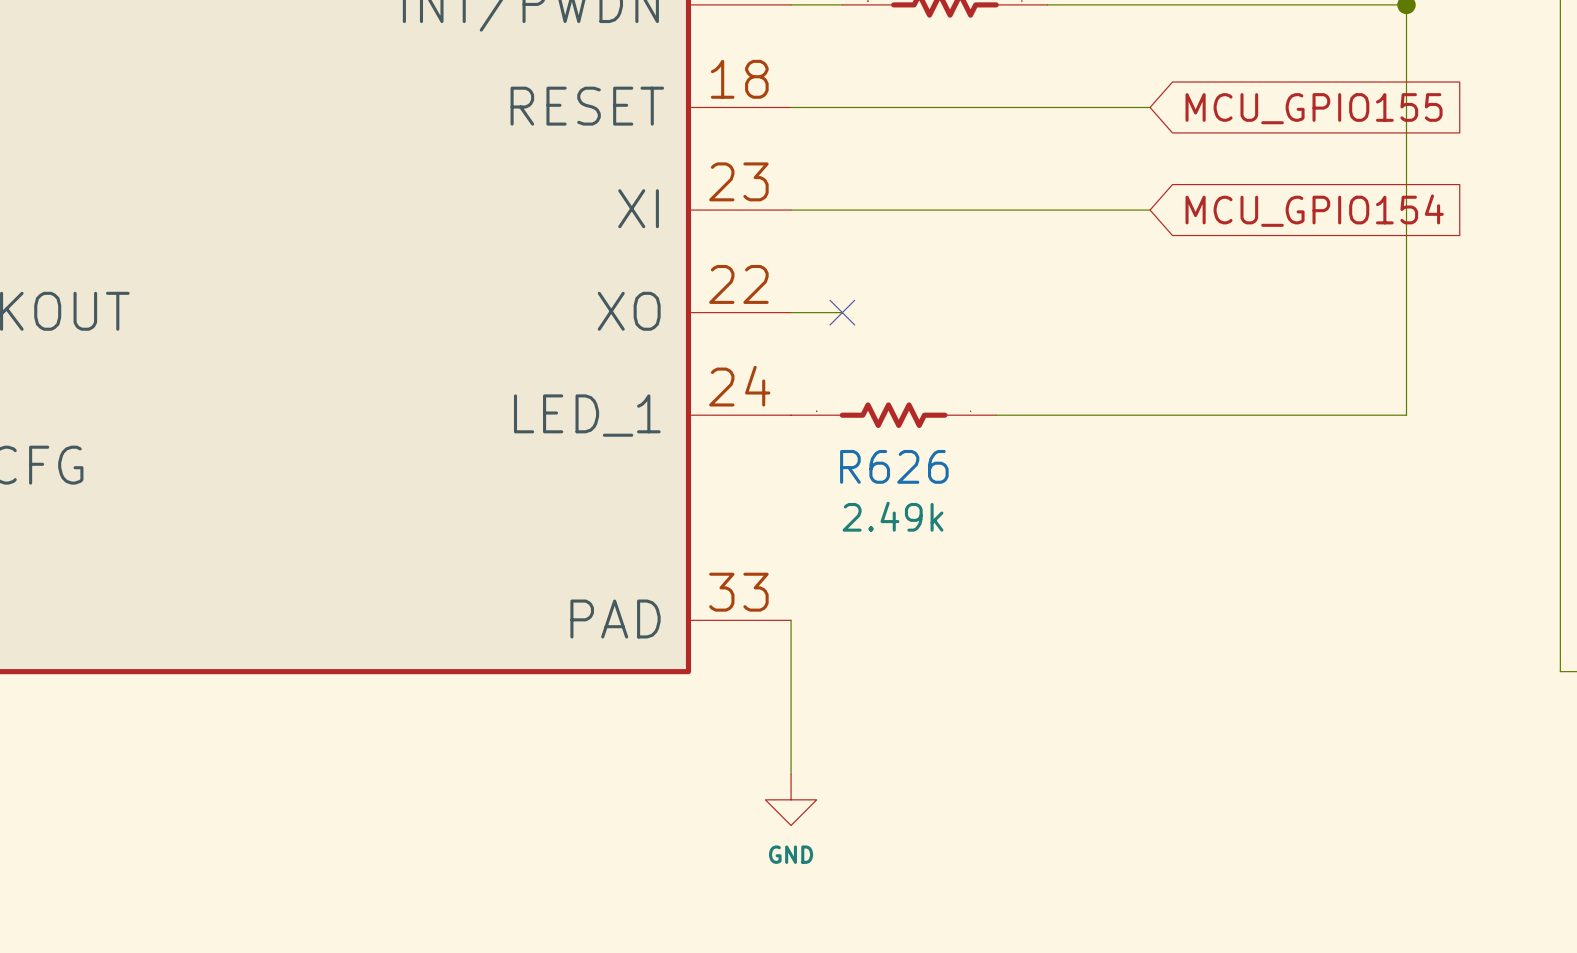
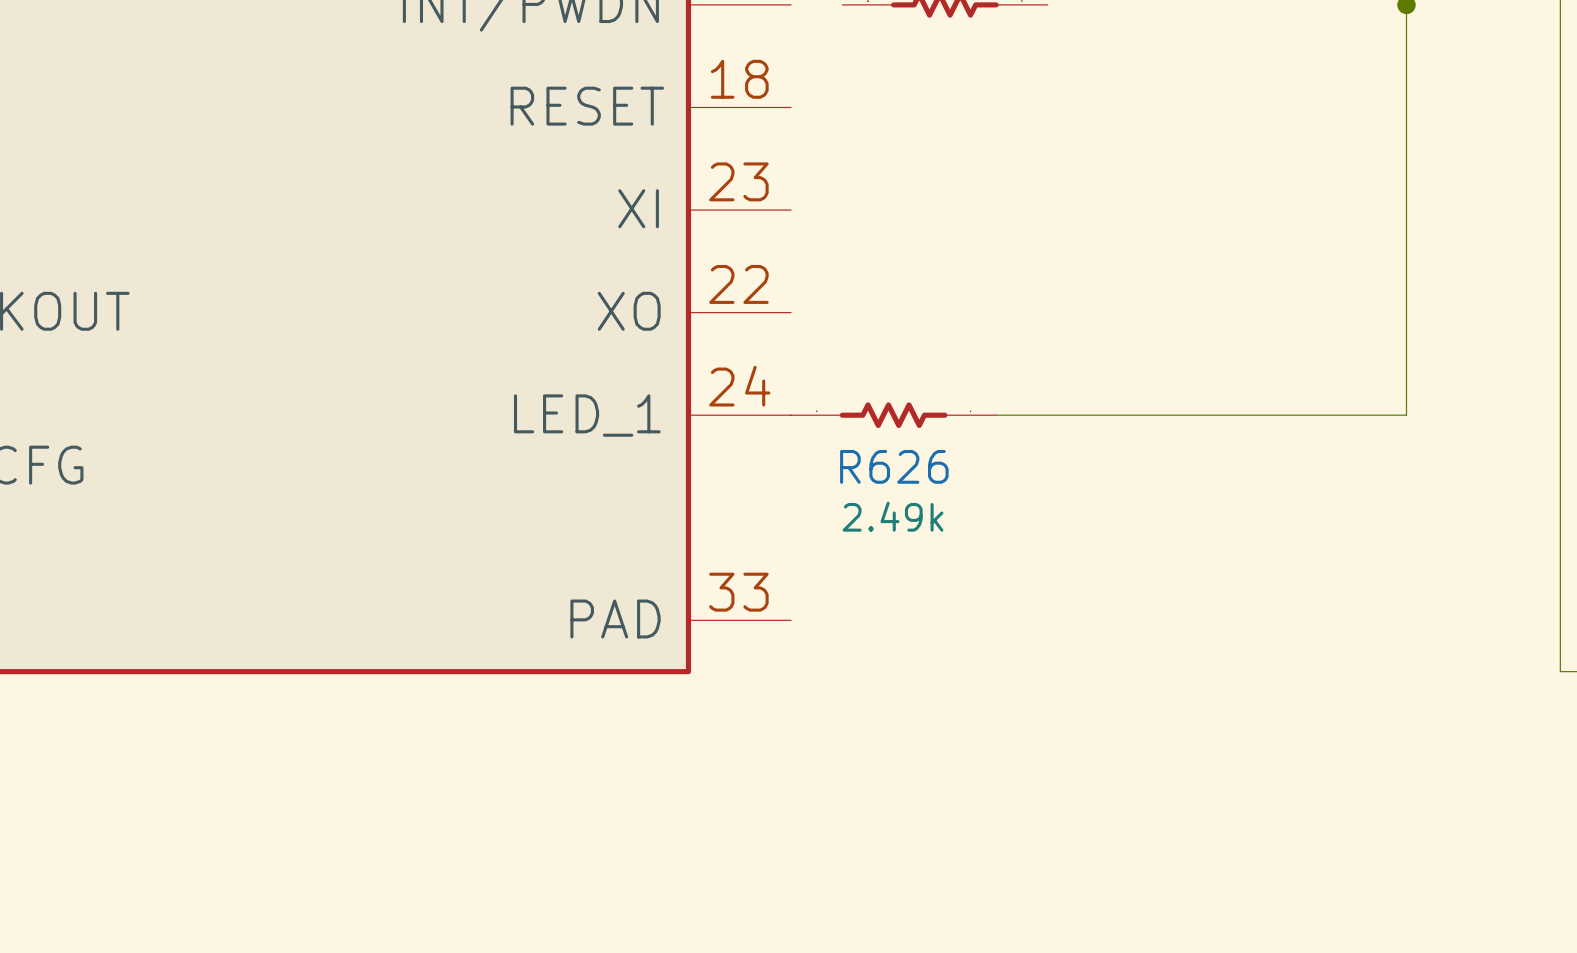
wire: (791, 4) (842, 4) -> none
wire: (1047, 4) (1406, 4) -> none
wire: (791, 107) (1150, 107) -> none
global label: MCU_GPIO155 (1314, 108) -> none
wire: (791, 210) (1150, 210) -> none
global label: MCU_GPIO154 (1314, 210) -> none
wire: (791, 312) (842, 312) -> none
no-connect mark: (842, 312) -> none
wire: (791, 620) (791, 774) -> none
power symbol: GND (791, 799) -> none

